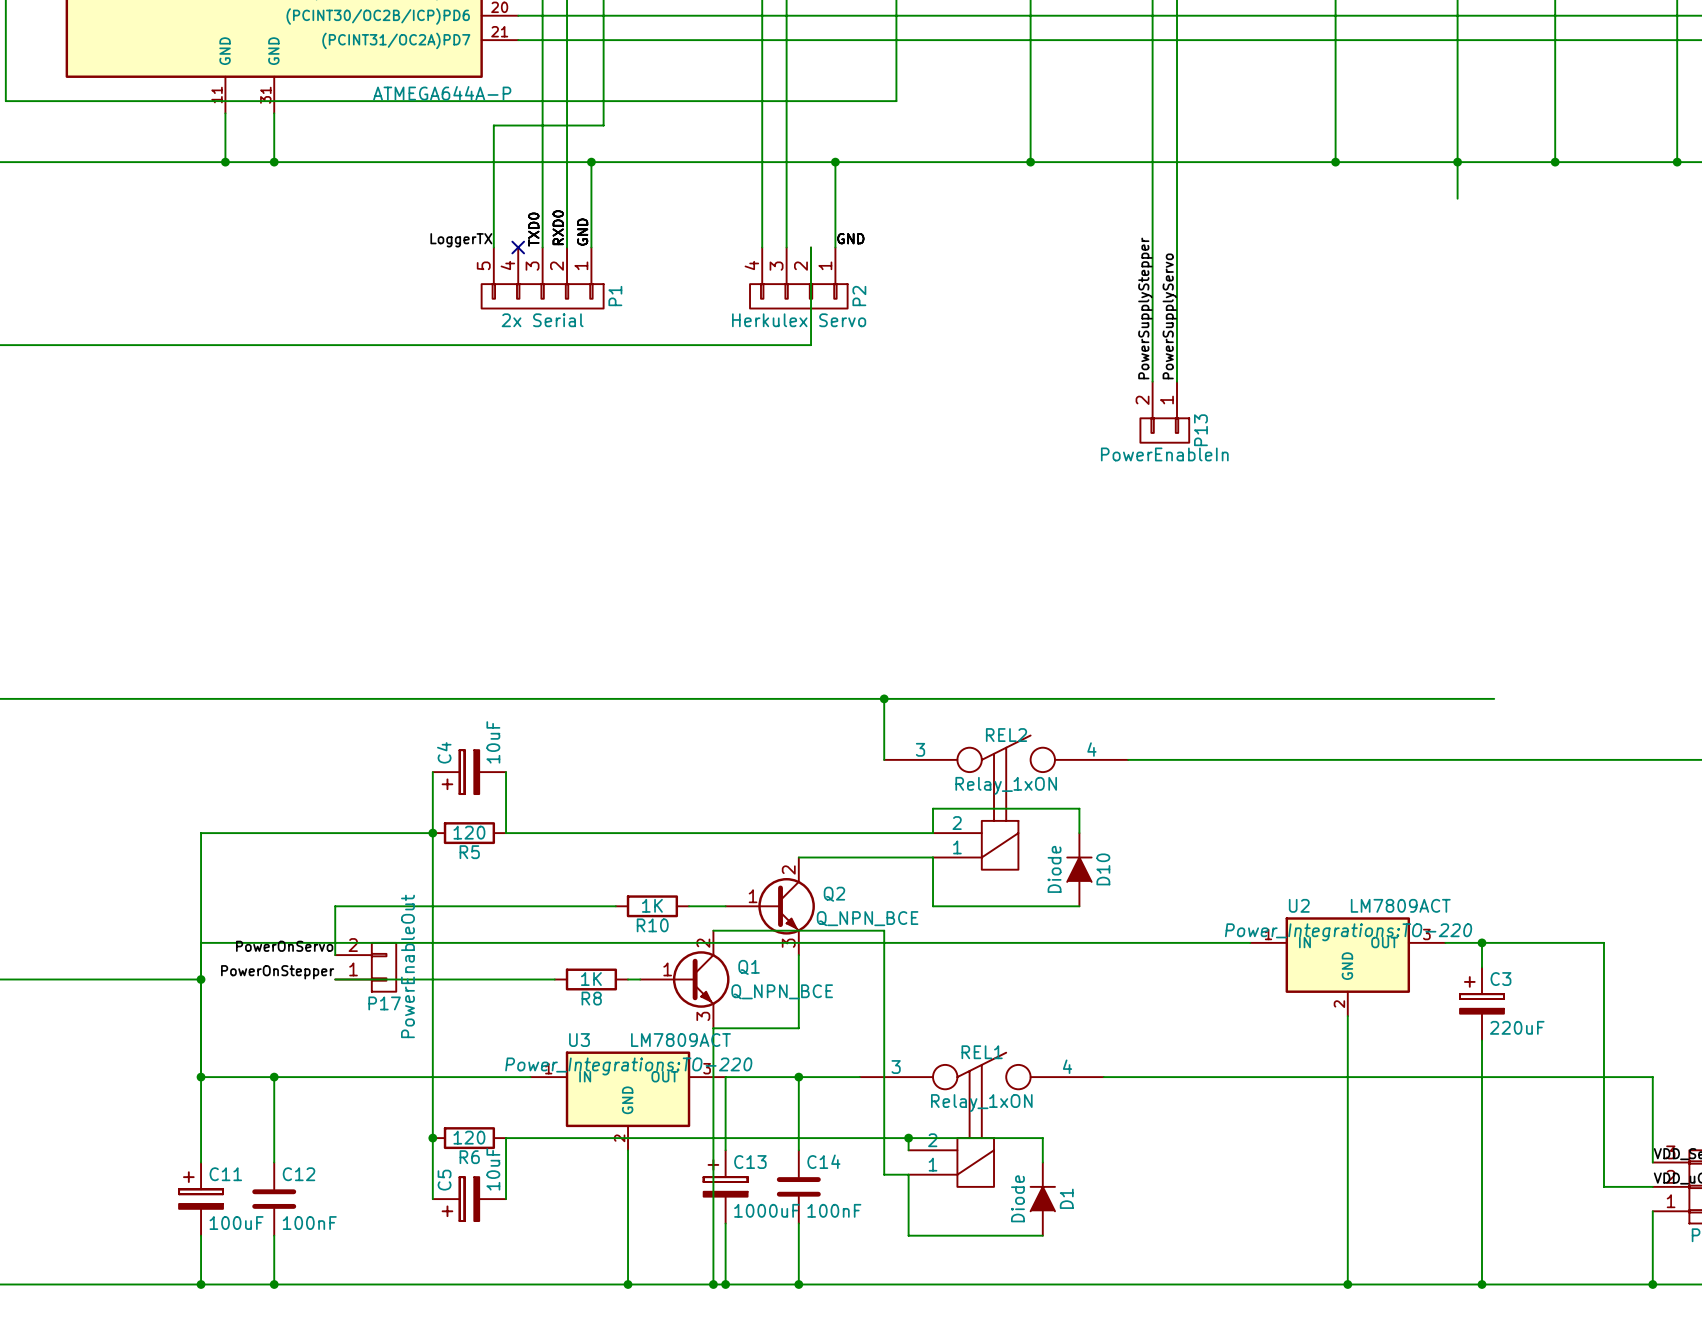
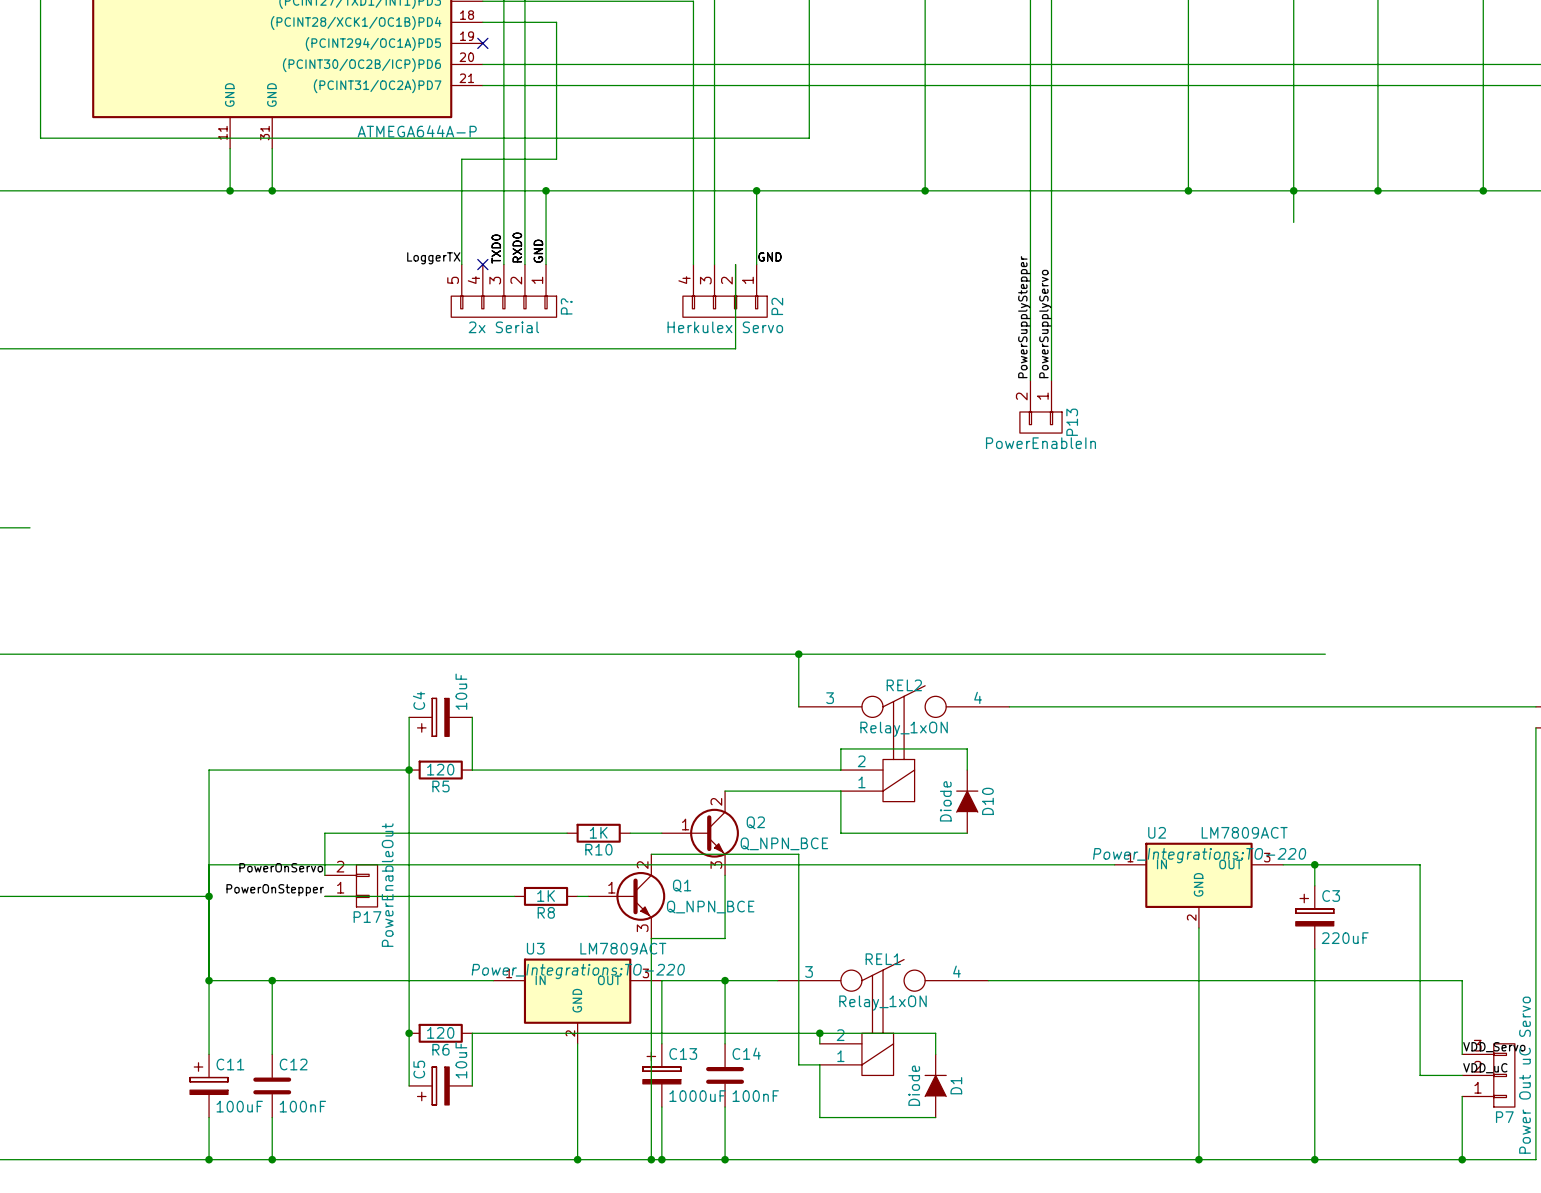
P1 name: P1 (615, 296) -> P? (566, 306)

